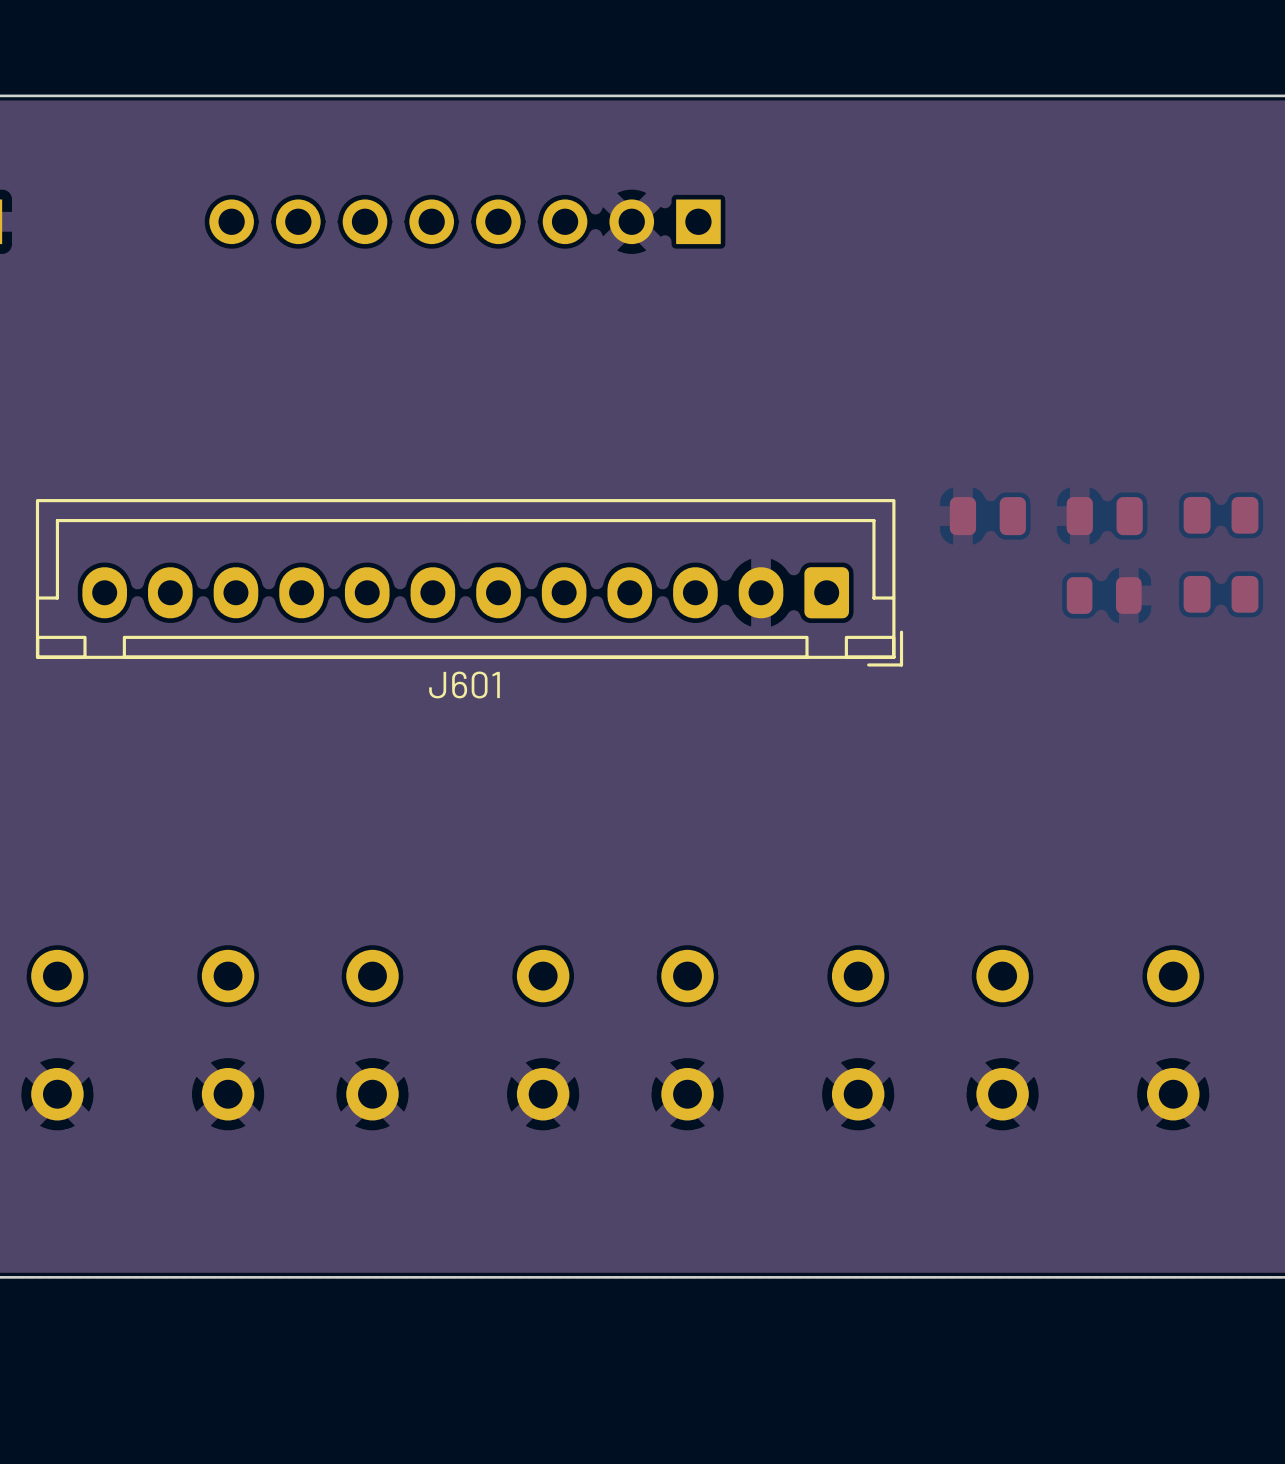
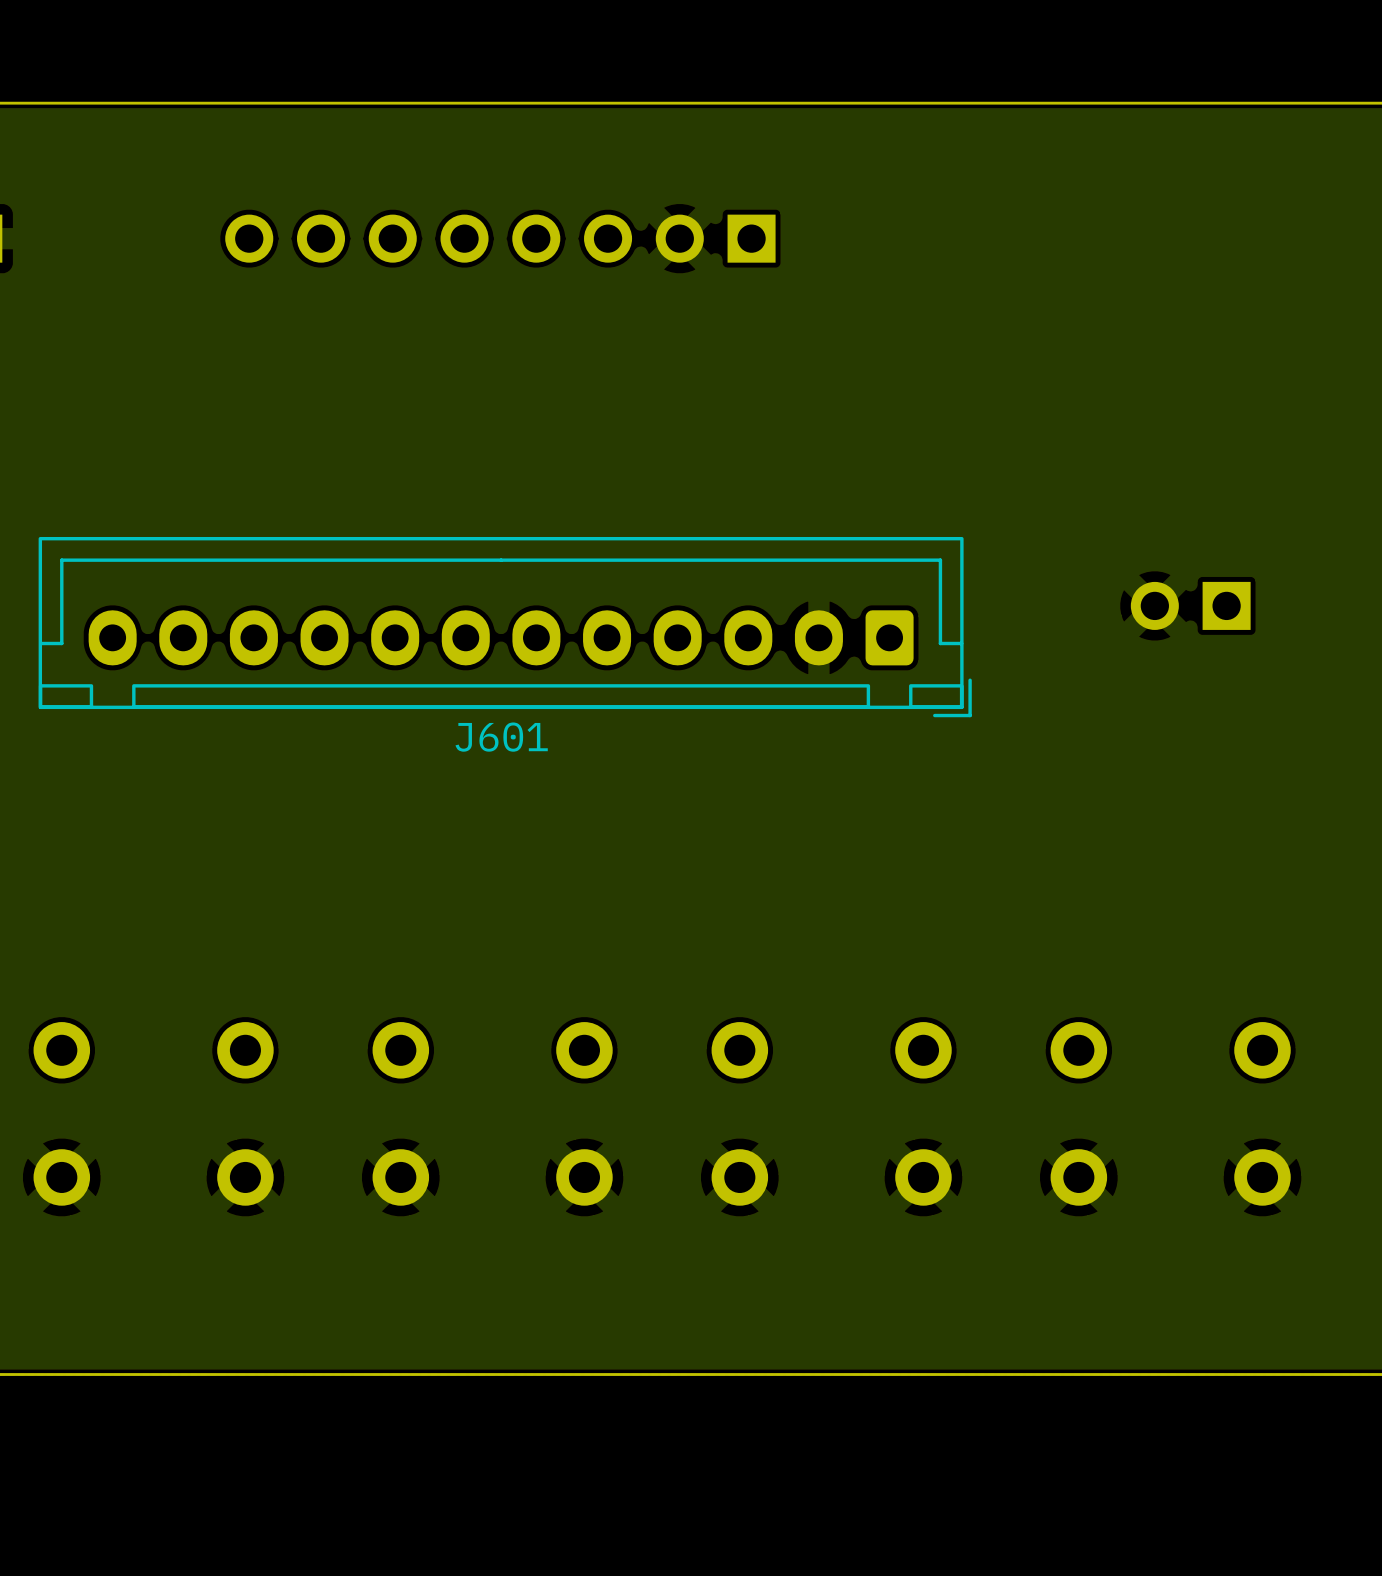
part: (1221, 515) -> none
part: (987, 516) -> none
part: (1104, 516) -> none
part: none -> (1190, 605)
part: (1221, 594) -> none
part: (1104, 595) -> none

